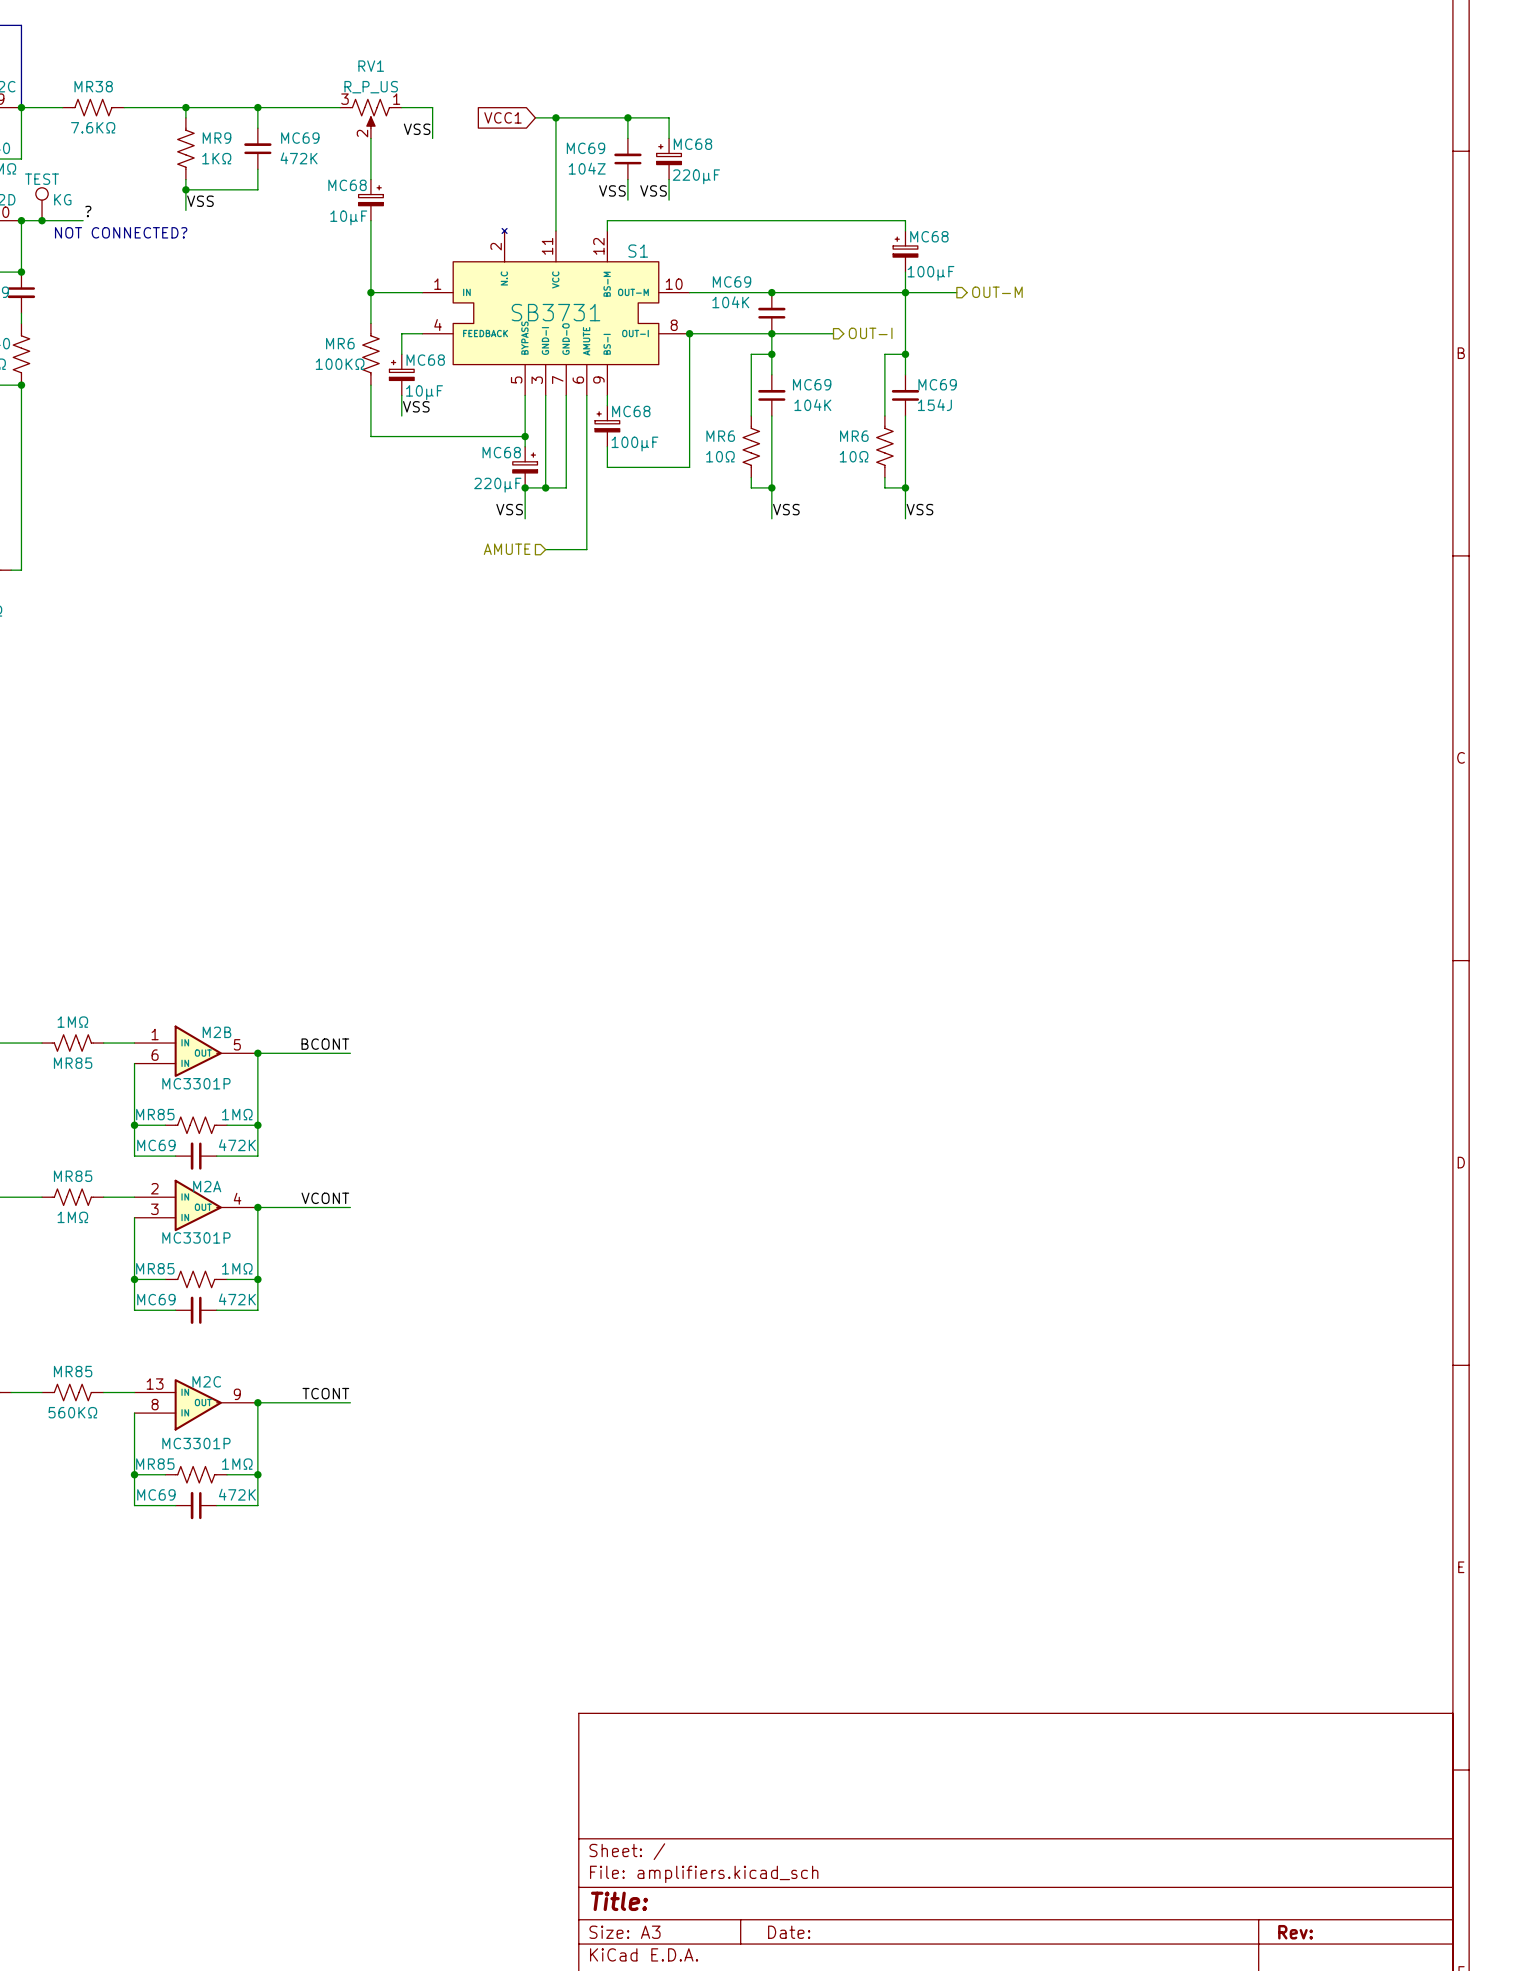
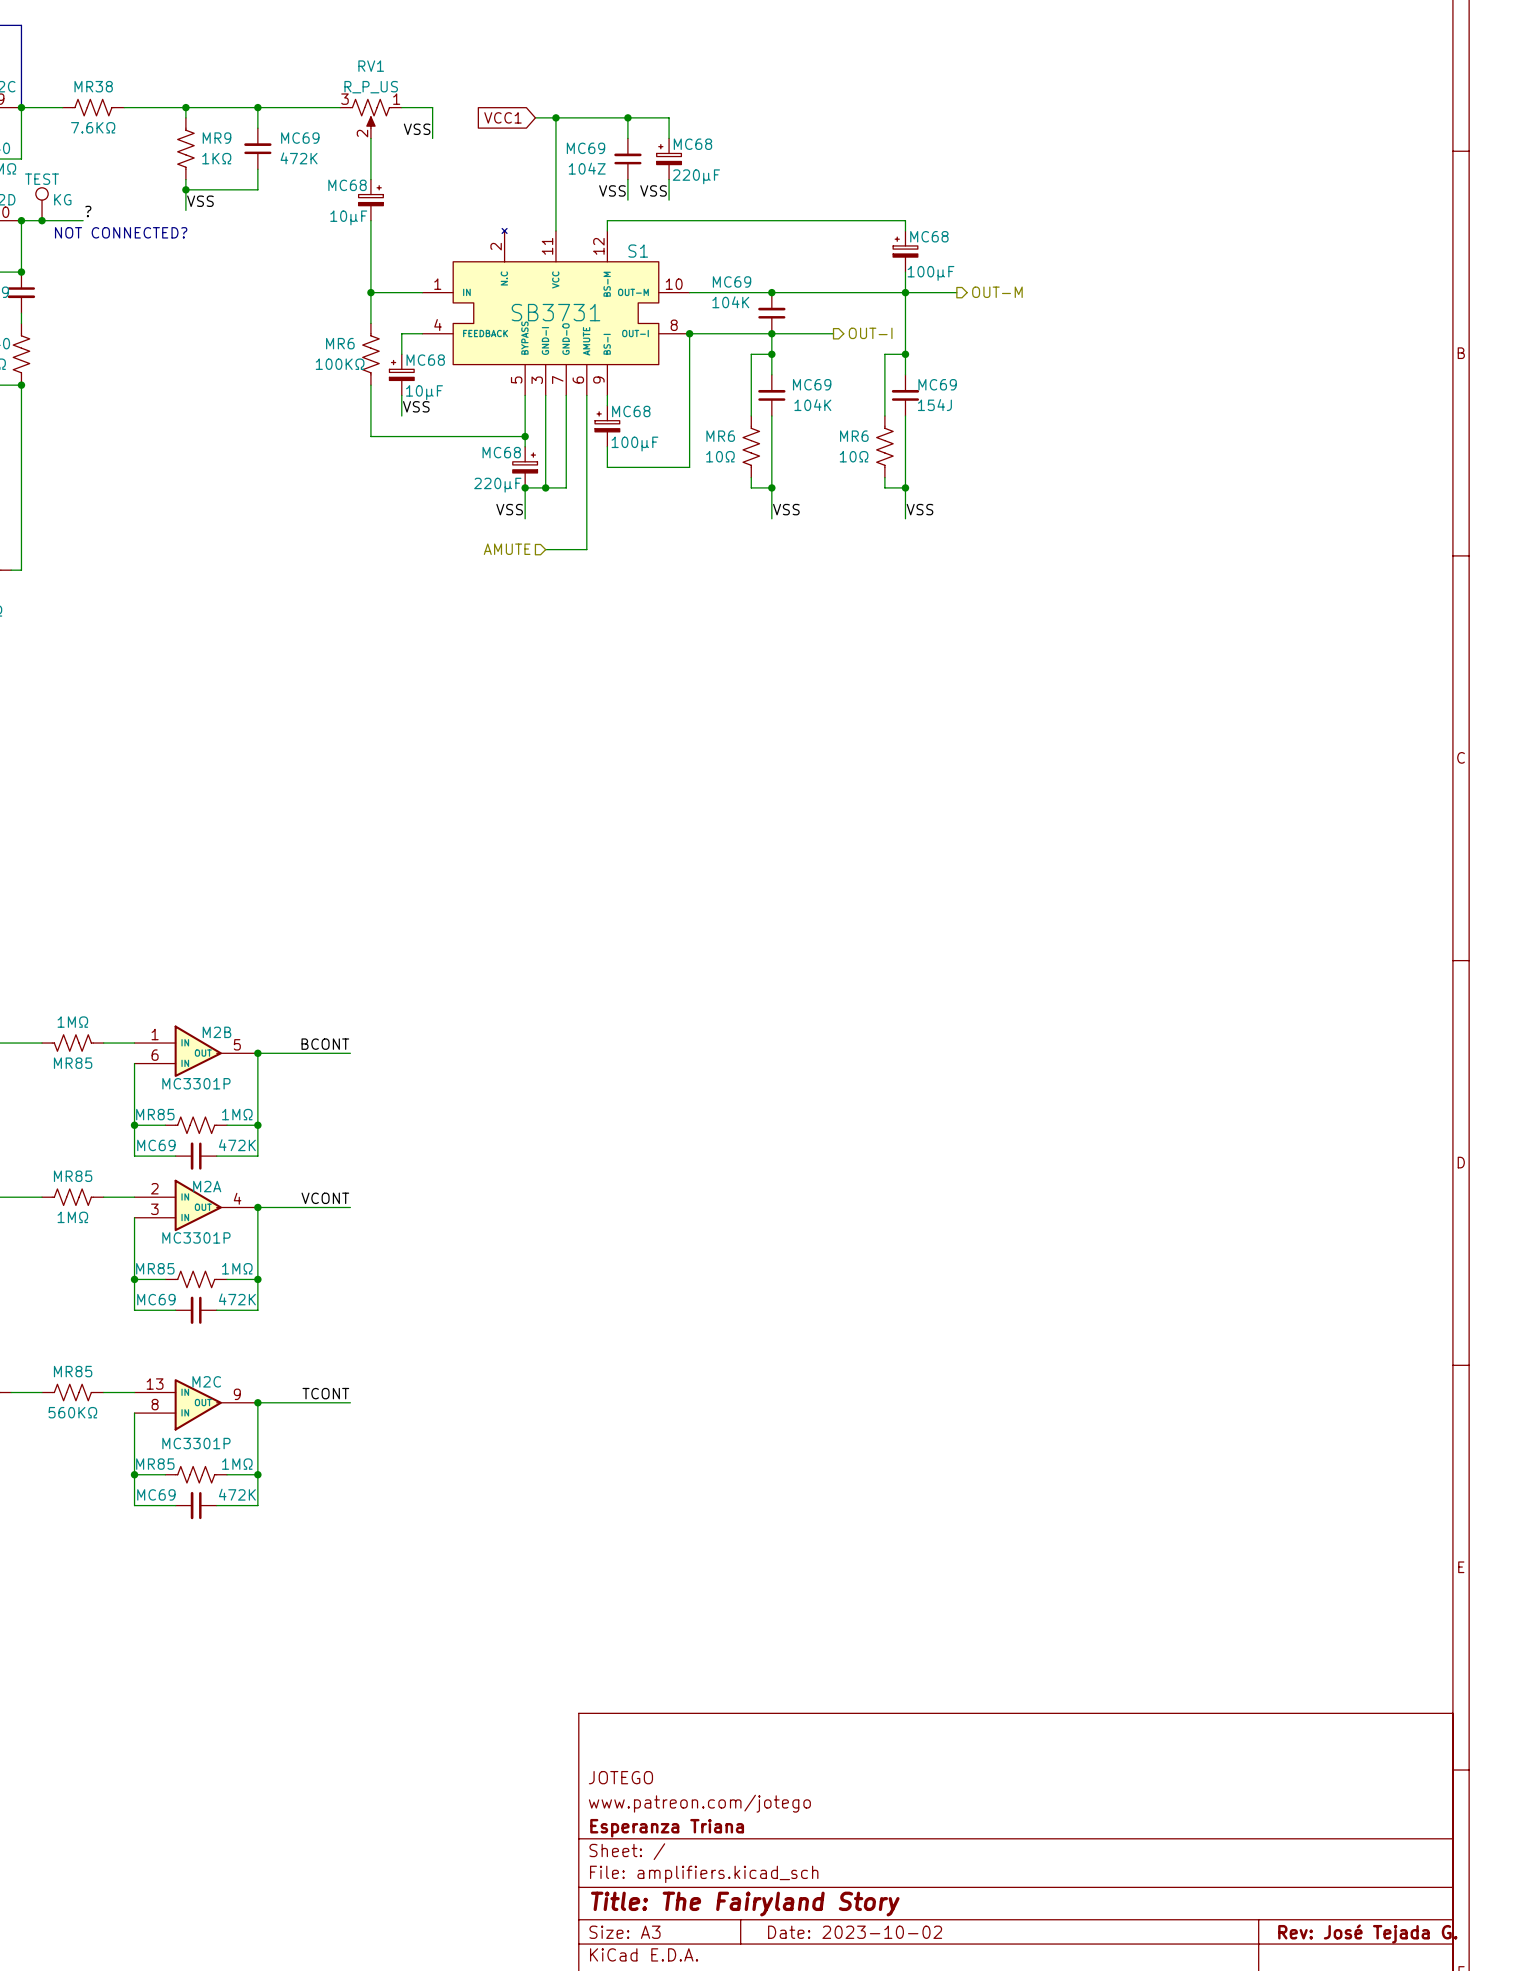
title block: none -> JOTEGO (620, 1777)
title block: none -> www.patreon.com/jotego (699, 1803)
title block: none -> Esperanza Triana (667, 1828)
title block: Title: (619, 1901) -> Title: The Fairyland Story (745, 1904)
title block: Date: (789, 1932) -> Date: 2023-10-02 (855, 1932)
title block: Rev: (1295, 1932) -> Rev: José Tejada G. (1367, 1933)

